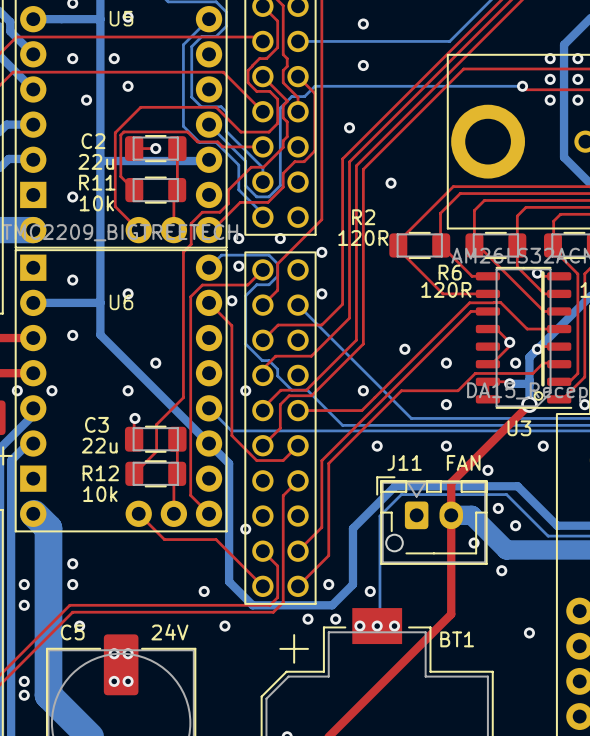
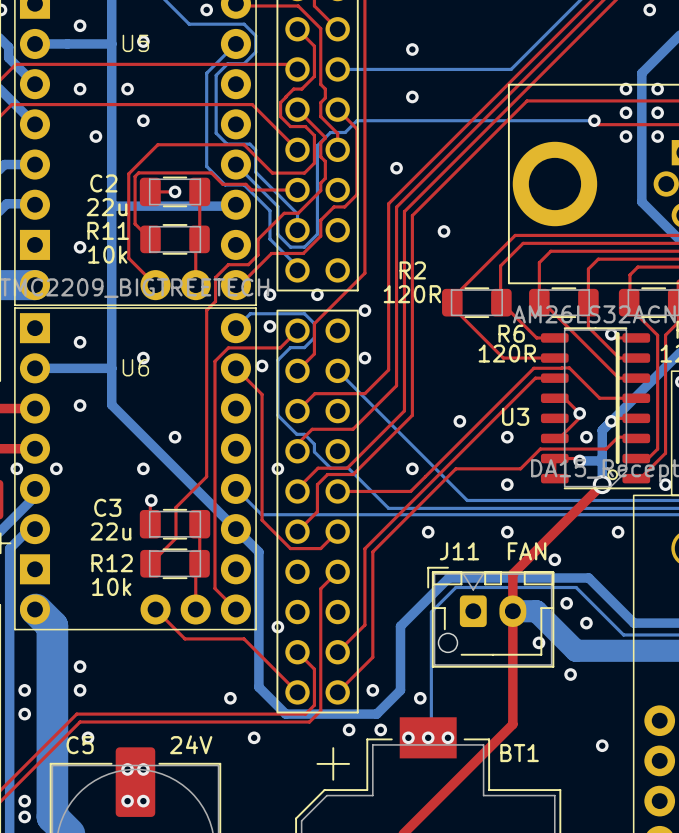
U3 name position: U3 (519, 428) -> U3 (515, 416)

